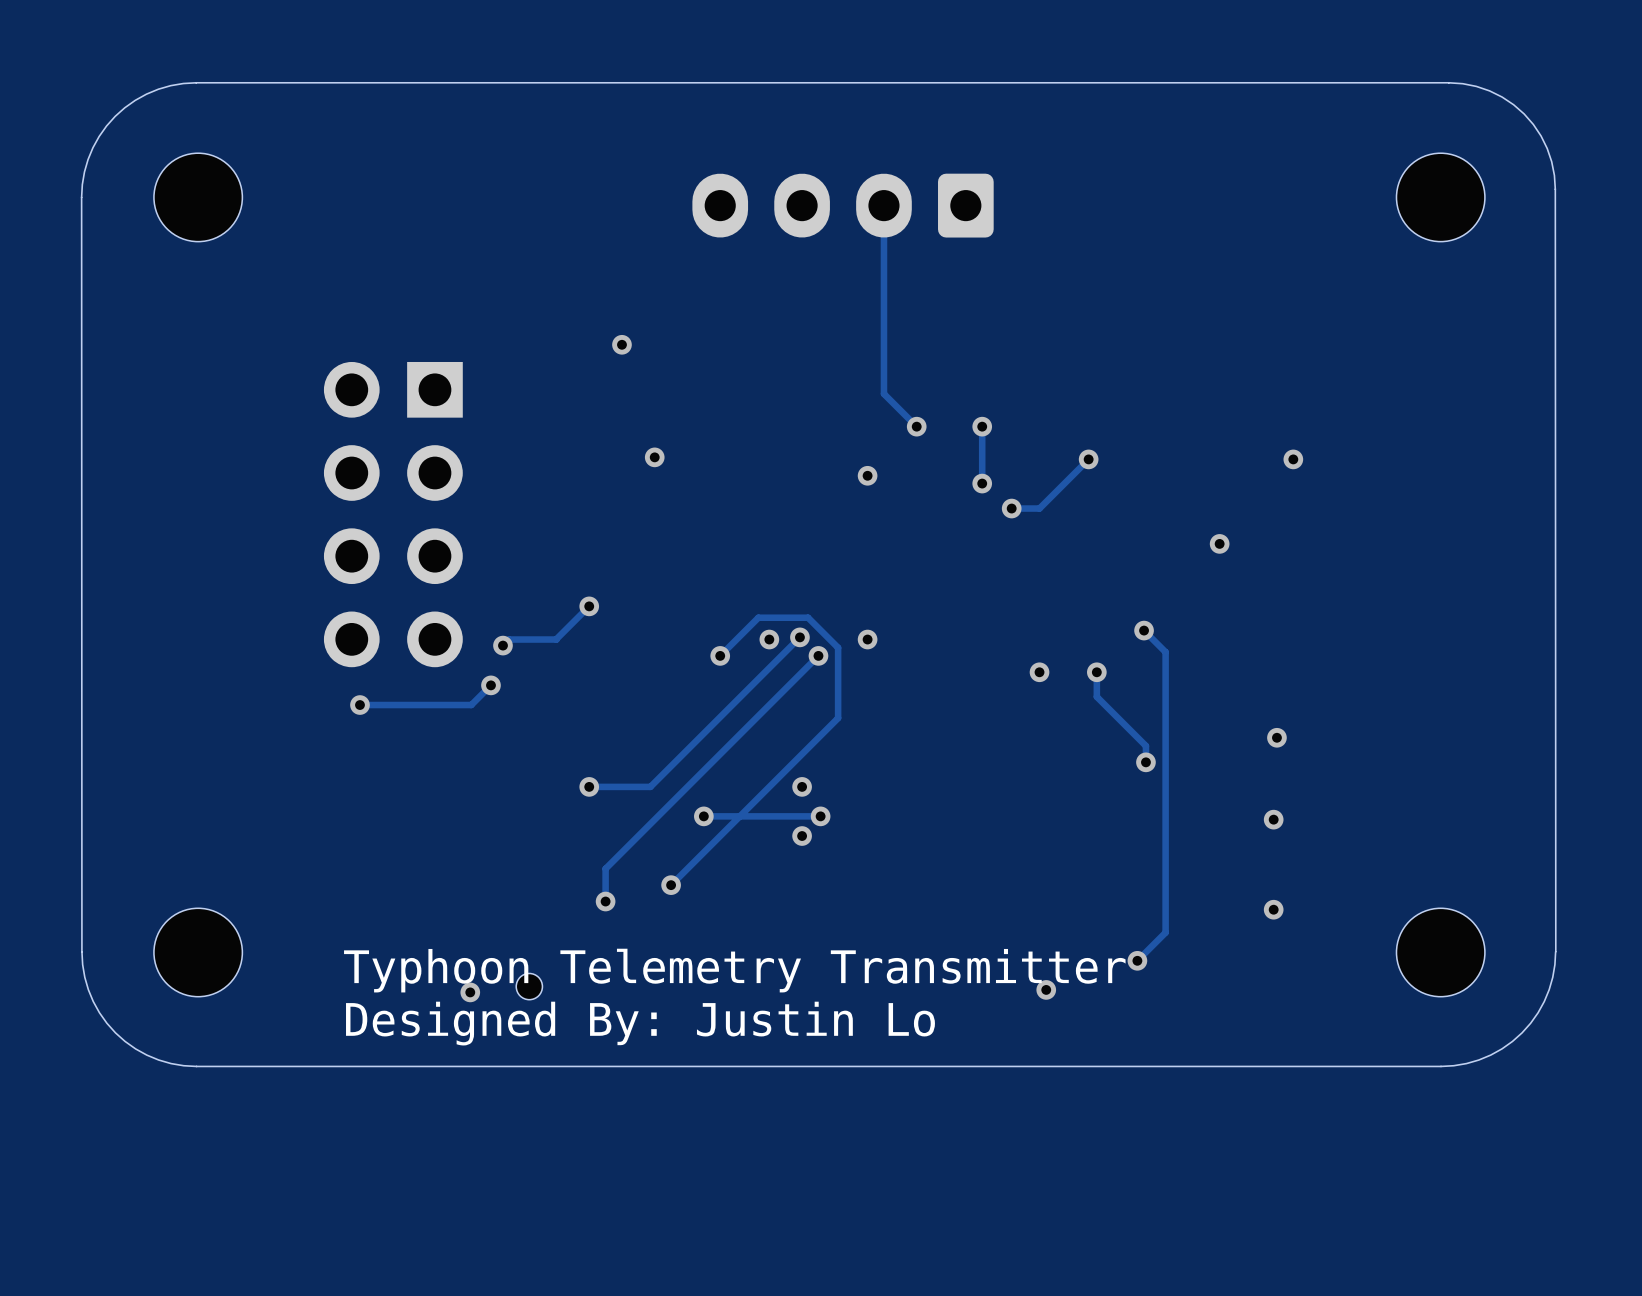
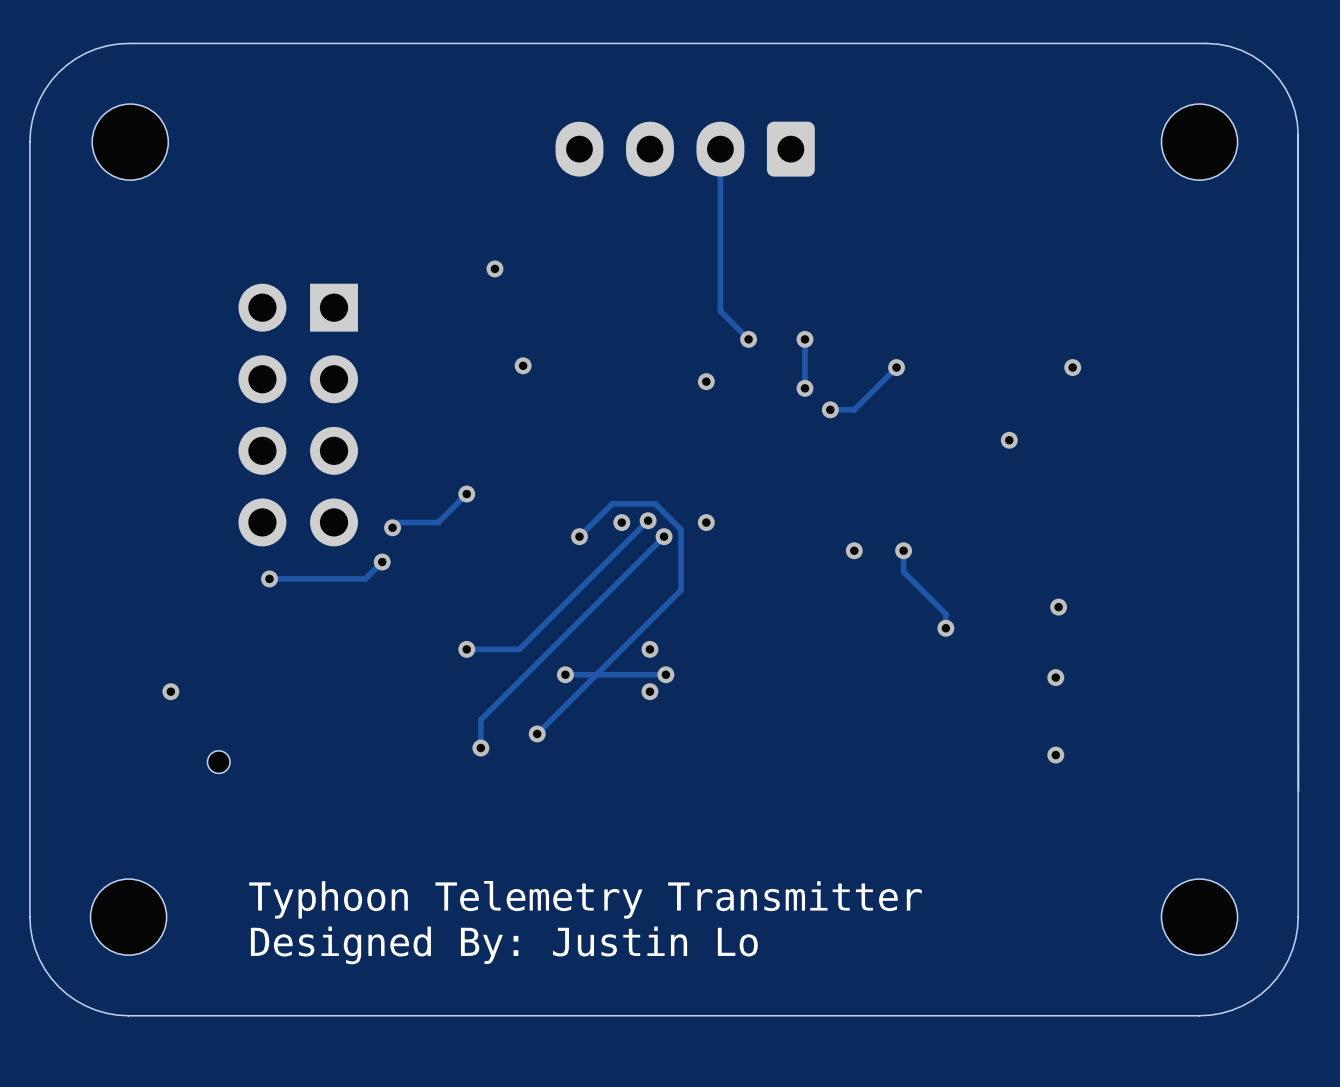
board edge: (81, 197) (82, 964) (88, 989) (99, 1012) (115, 1032) (146, 1055) (171, 1063) (196, 1066) (1453, 1065) (1478, 1060) (1501, 1048) (1530, 1023) (1549, 989) (1555, 951) -> (29, 142) (29, 917) (32, 939) (39, 959) (51, 978) (67, 994) (96, 1010) (128, 1015) (1199, 1015) (1221, 1013) (1242, 1005) (1269, 986) (1288, 959) (1297, 928) (1298, 135)
track: (1144, 630) (1165, 652) (1165, 932) (1137, 960) -> none
via: (1144, 630) -> none
via: none -> (170, 691)
part position: (198, 952) -> (128, 917)
part position: (1440, 952) -> (1199, 917)
via: (1137, 960) -> none
text position: Typhoon Telemetry Transmitter (734, 970) -> Typhoon Telemetry Transmitter (585, 899)
part position: (529, 986) -> (218, 762)
via: (1046, 989) -> none
via: (470, 992) -> none
text position: Designed By: Justin Lo (640, 1023) -> Designed By: Justin Lo (504, 945)

